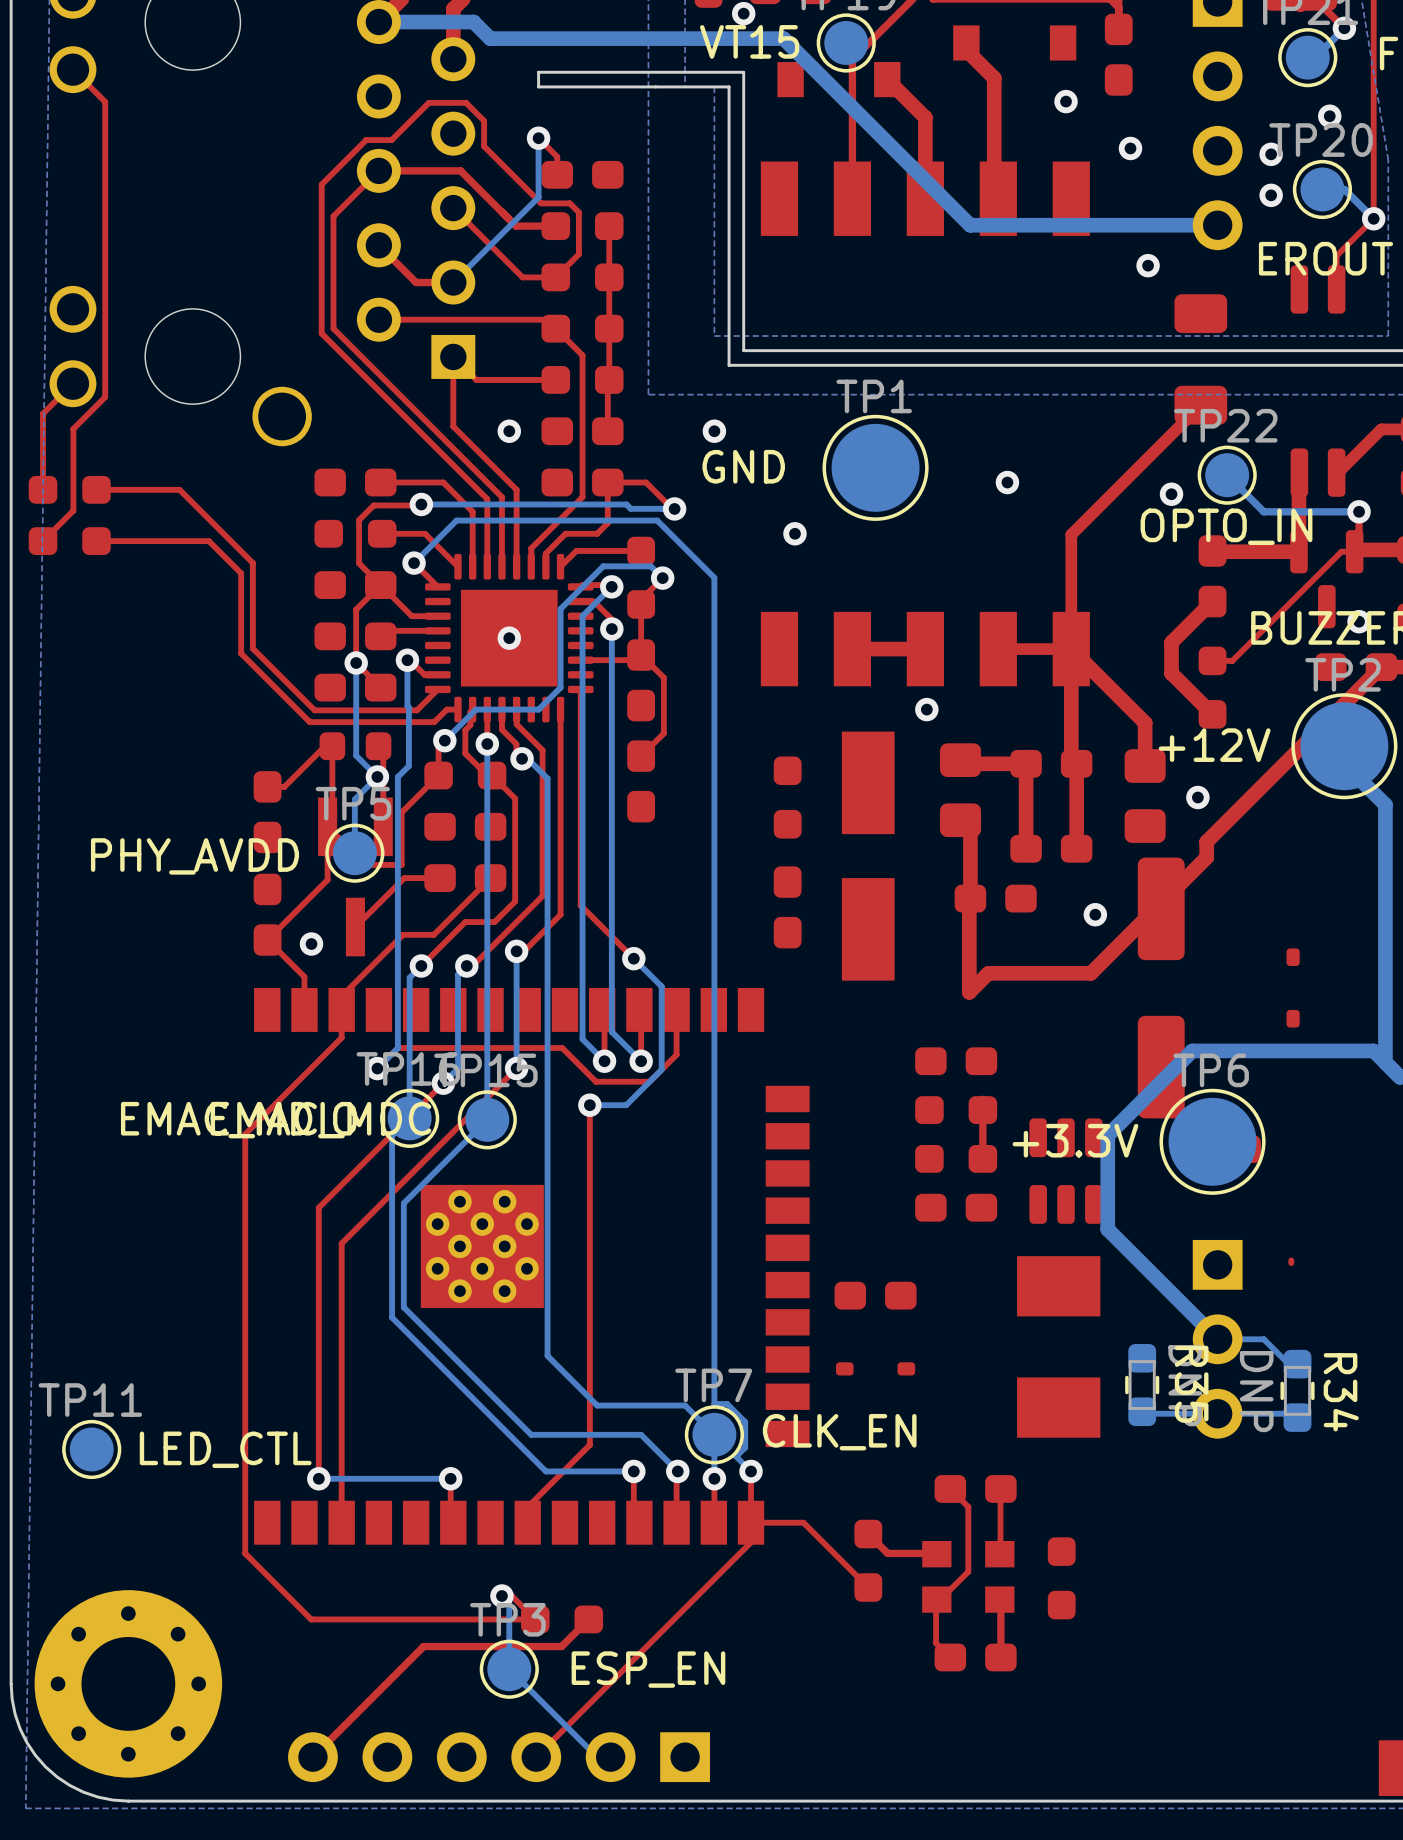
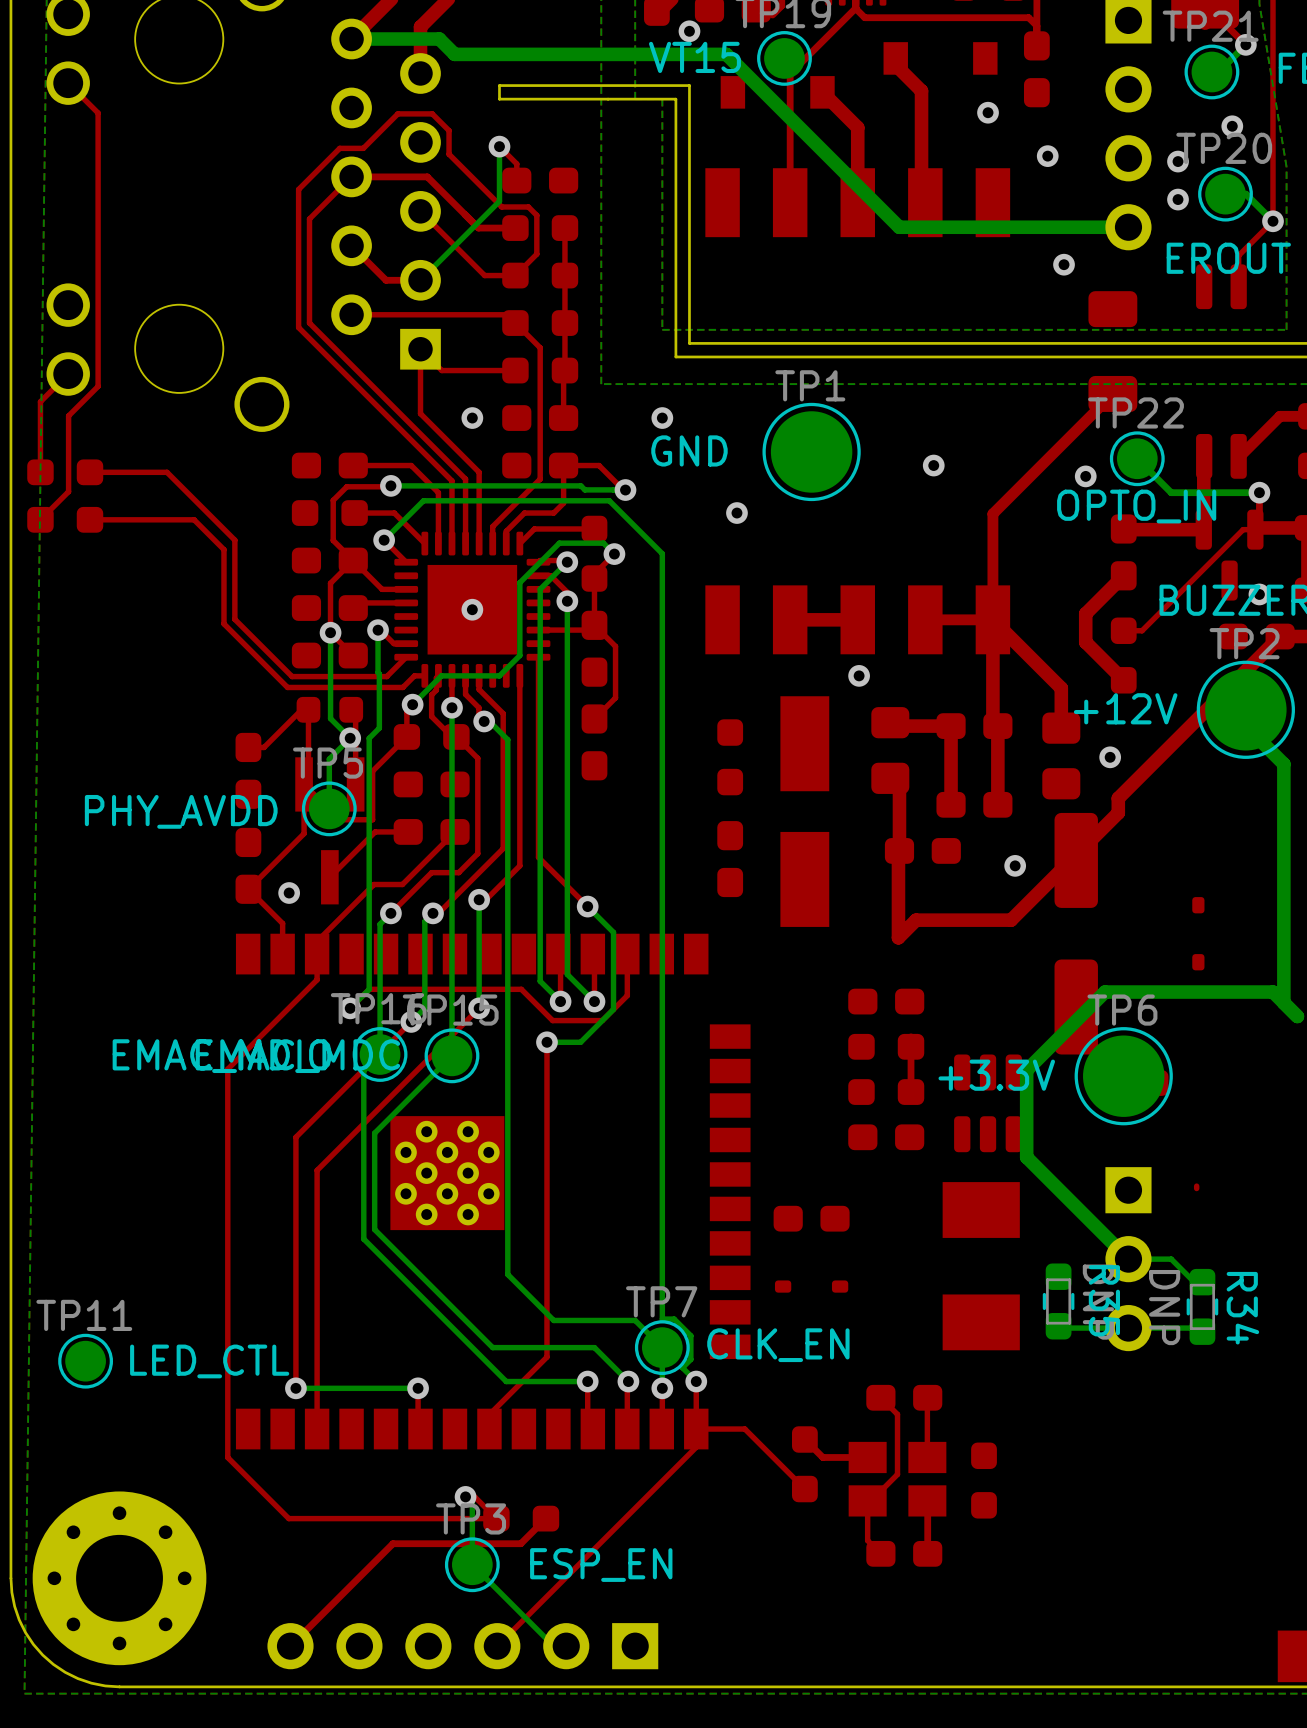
part footprint: [922, 1540, 1015, 1613] -> [848, 1441, 947, 1517]

